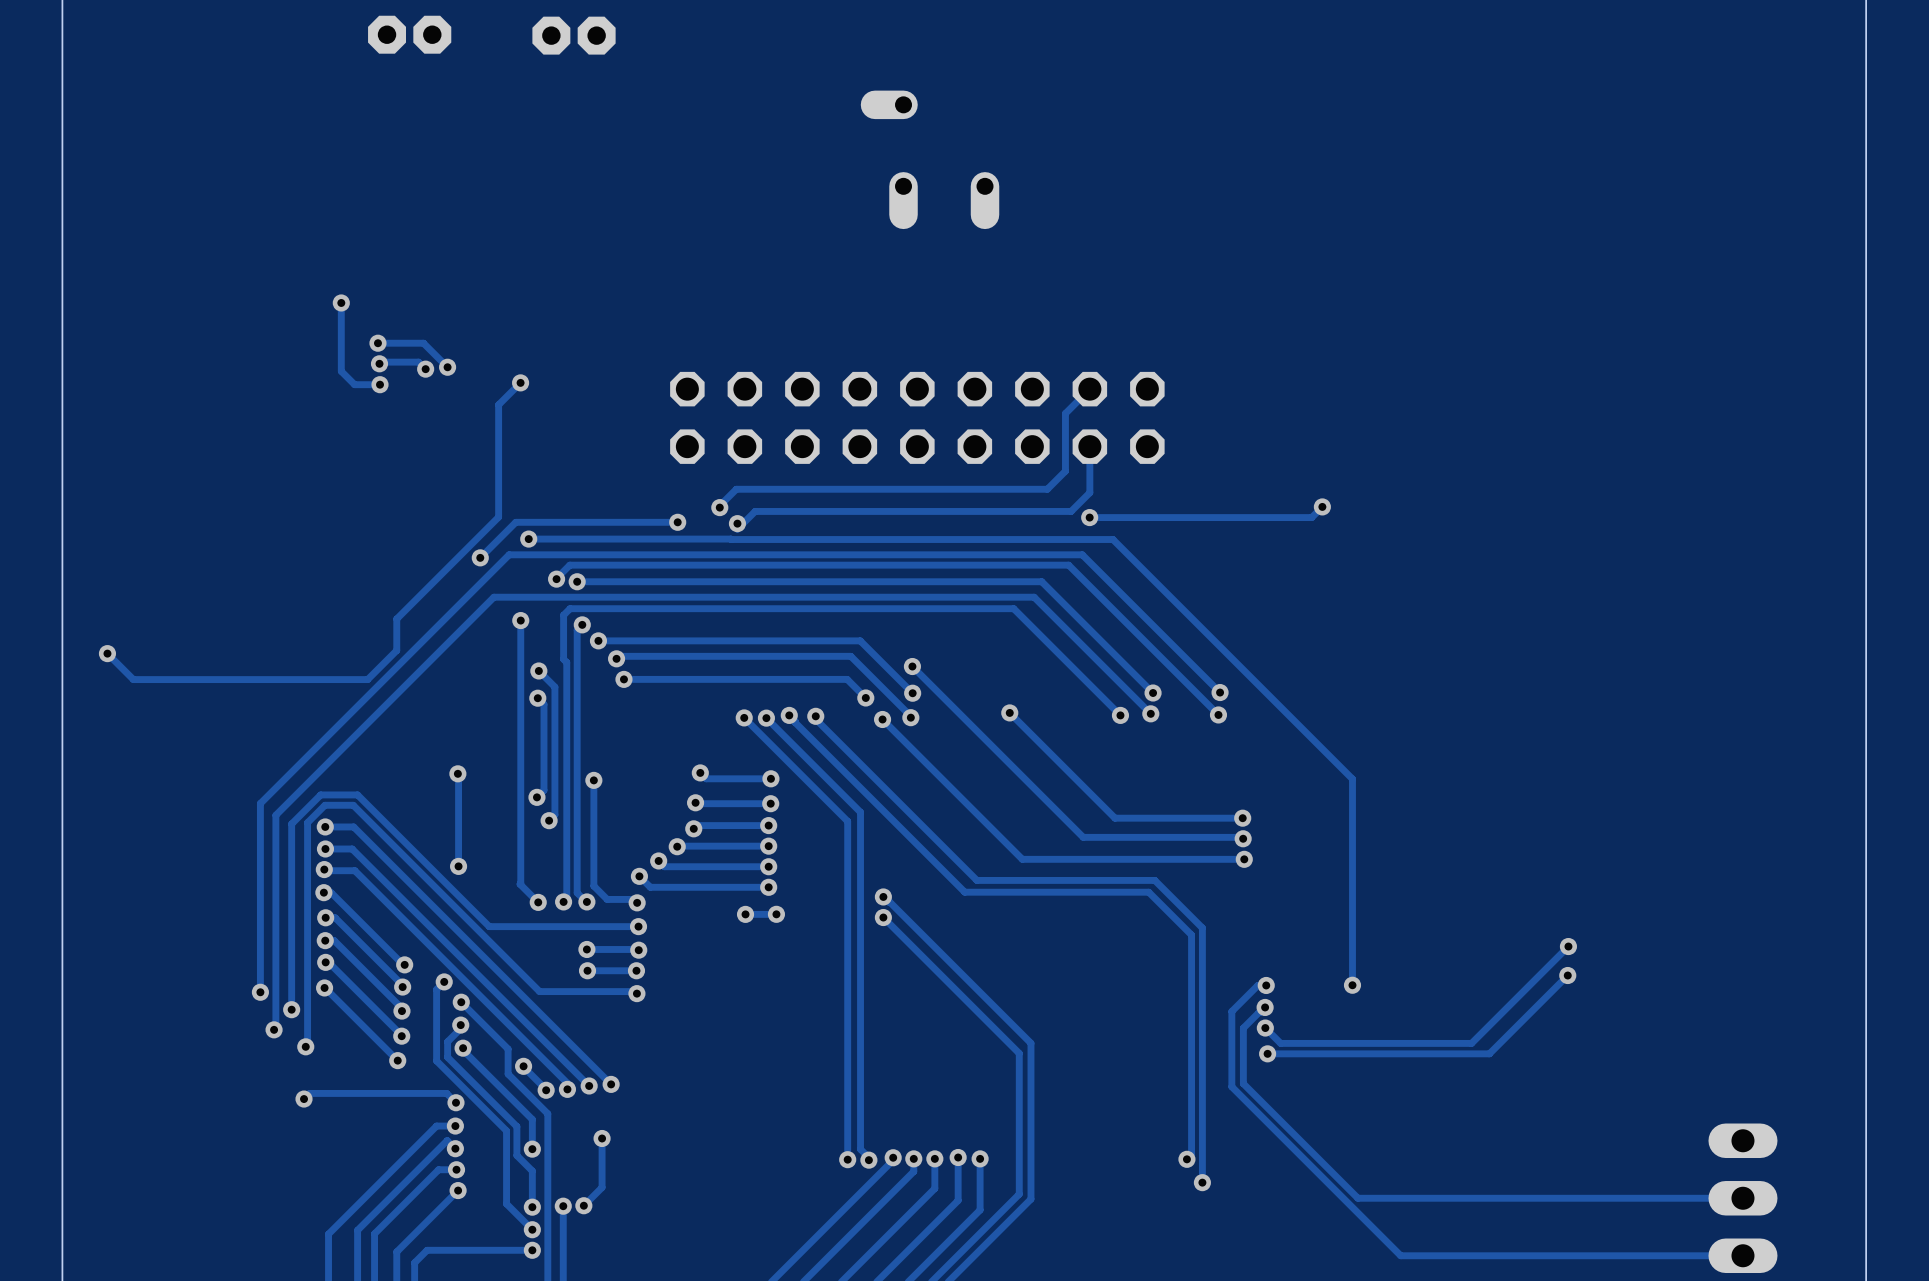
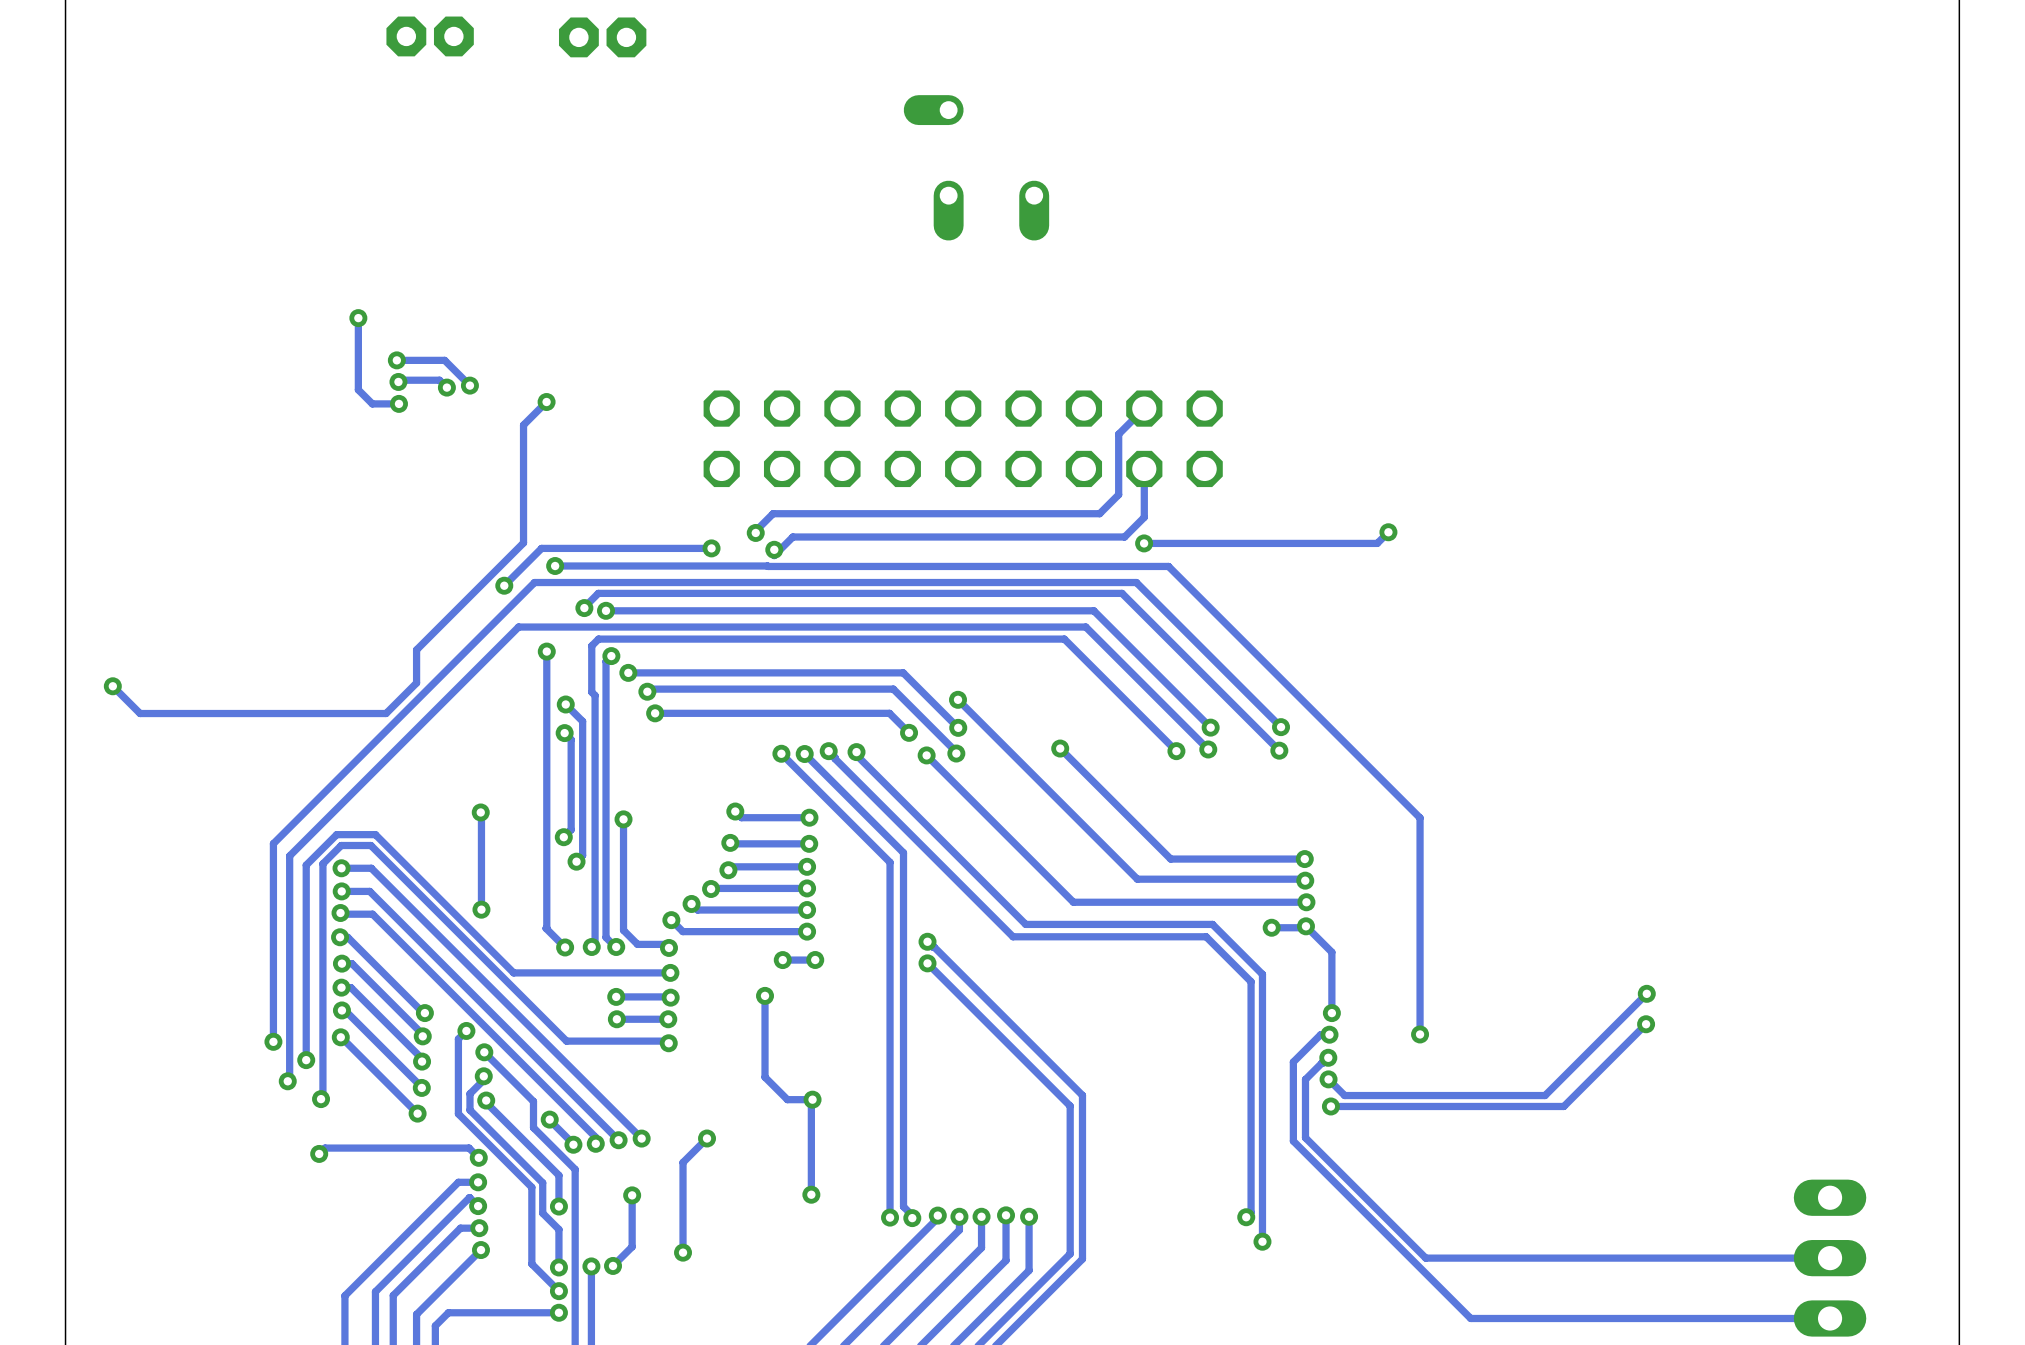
via: none -> (1305, 926)
track: none -> (1271, 927) (1301, 927) (1305, 925) (1331, 952) (1331, 1013)
via: none -> (1271, 927)
track: none -> (765, 995) (765, 1077) (787, 1099) (812, 1099) (811, 1194)
via: none -> (765, 995)
via: none -> (1331, 1013)
via: none -> (812, 1099)
track: none -> (707, 1138) (683, 1162) (683, 1252)
via: none -> (707, 1138)
via: none -> (811, 1194)
via: none -> (683, 1252)

